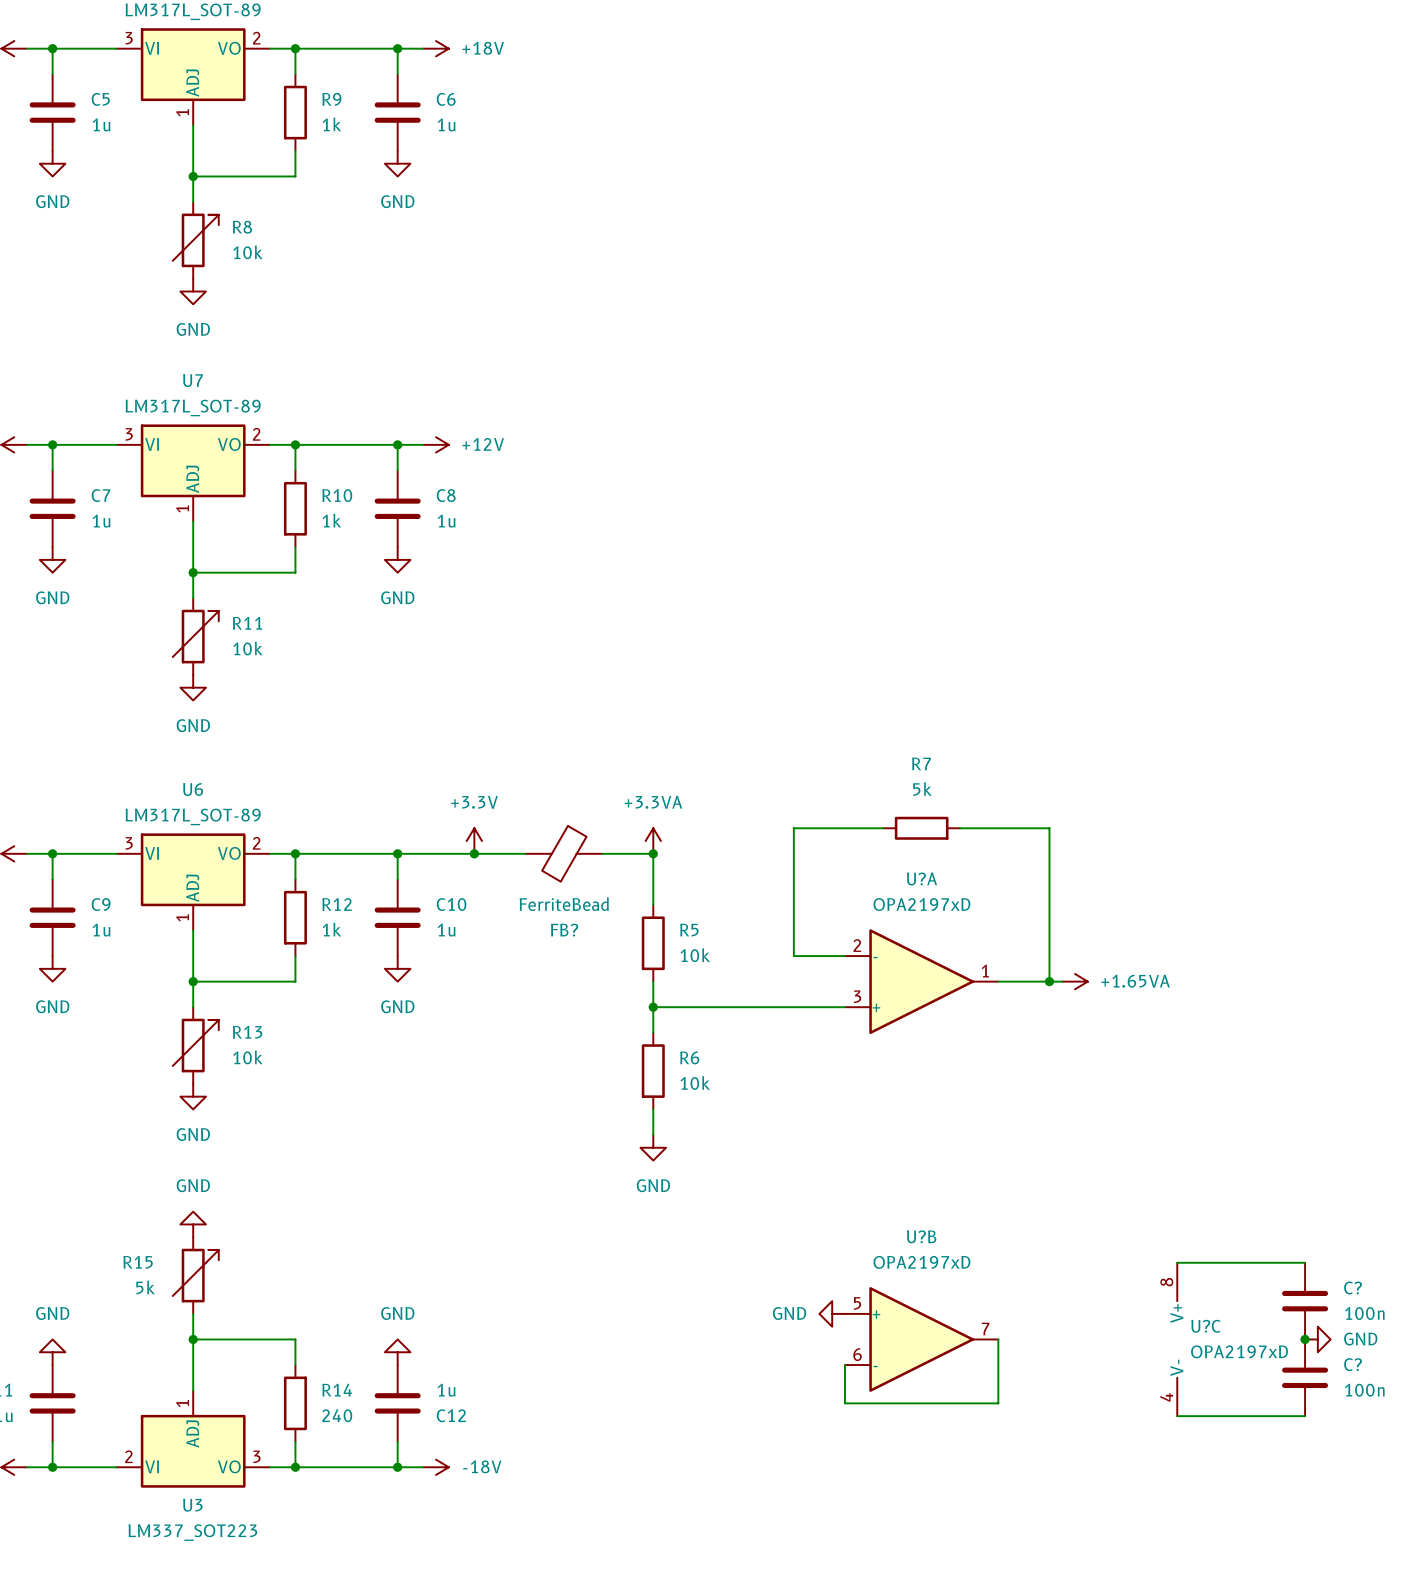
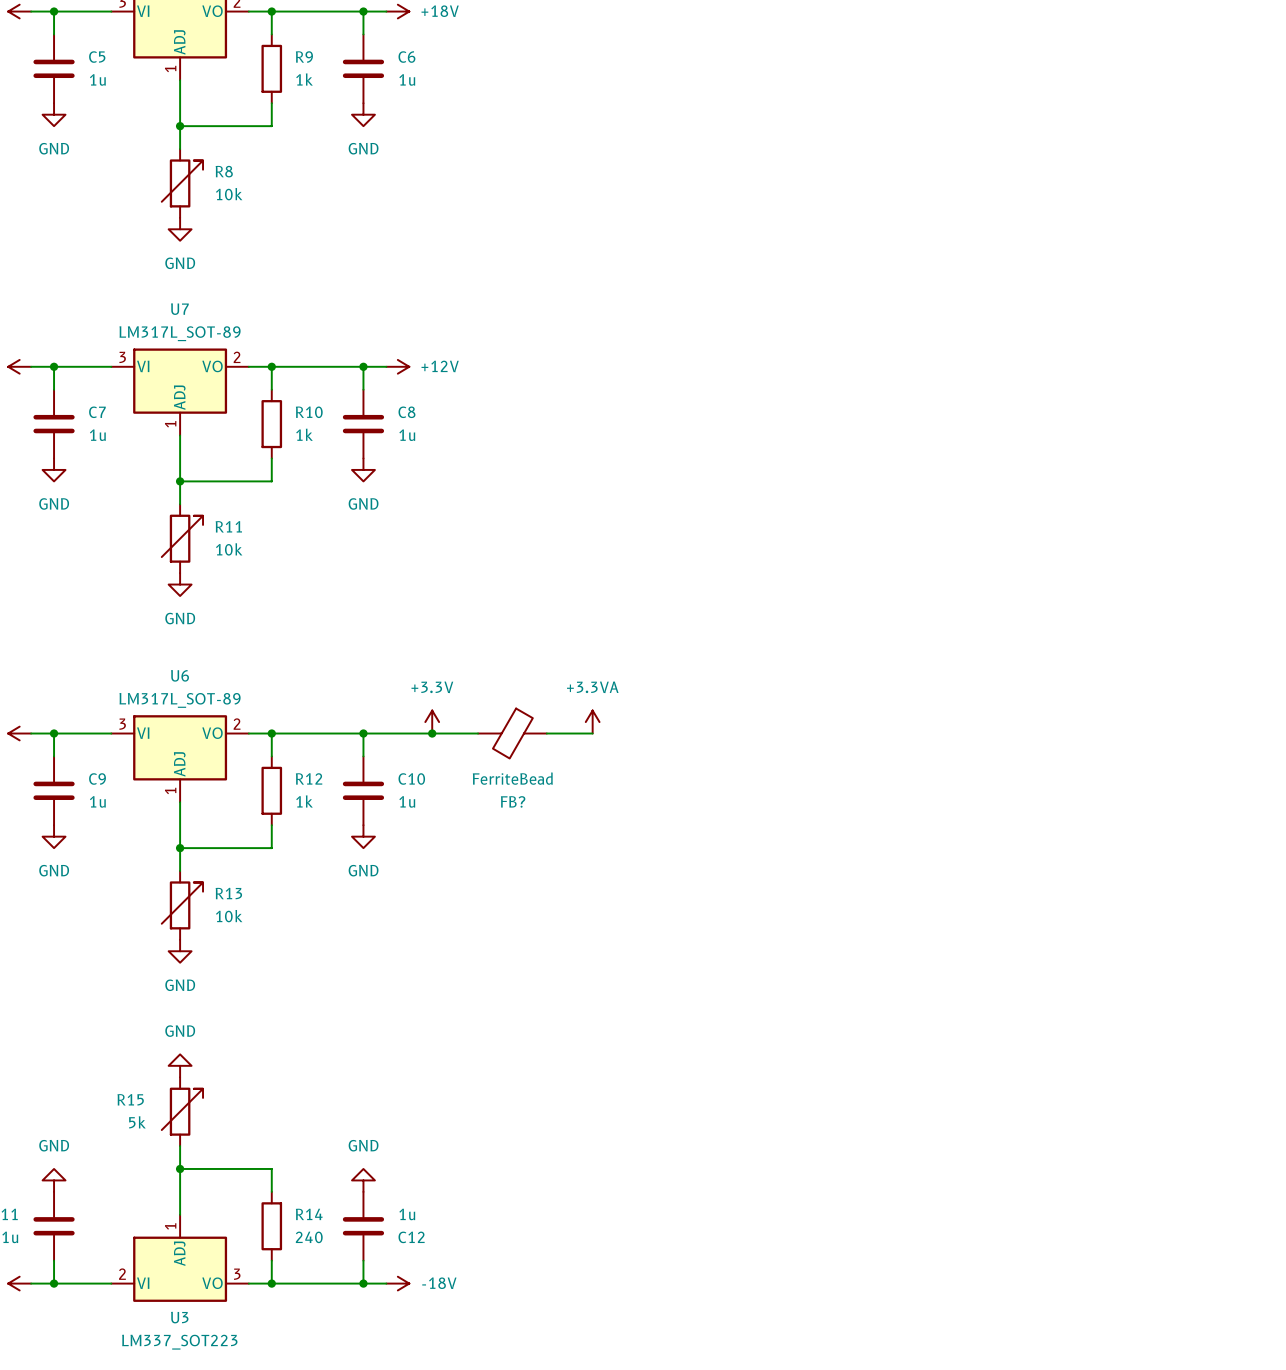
wire: (883, 828) (793, 828) (793, 956) (844, 956) -> none
R7: 5k (921, 828) -> none
wire: (960, 828) (1049, 828) (1049, 981) -> none
wire: (653, 853) (653, 904) -> none
junction: (653, 853) -> none
R5: 10k (653, 943) -> none
wire: (653, 981) (653, 1032) -> none
U?A: OPA2197xD (921, 981) -> none
wire: (998, 981) (1062, 981) -> none
junction: (1049, 981) -> none
power symbol: +1.65VA (1075, 981) -> none
wire: (653, 1007) (844, 1007) -> none
junction: (653, 1007) -> none
R6: 10k (653, 1071) -> none
wire: (653, 1109) (653, 1134) -> none
power symbol: GND (653, 1147) -> none
wire: (1177, 1262) (1305, 1262) -> none
C?: 100n (1305, 1301) -> none
power symbol: GND (832, 1313) -> none
U?B: OPA2197xD (921, 1339) -> none
wire: (998, 1339) (998, 1403) (844, 1403) (844, 1365) -> none
U?C: OPA2197xD (1177, 1339) -> none
junction: (1305, 1339) -> none
power symbol: GND (1317, 1339) -> none
C?: 100n (1305, 1377) -> none
wire: (1177, 1416) (1305, 1416) -> none

